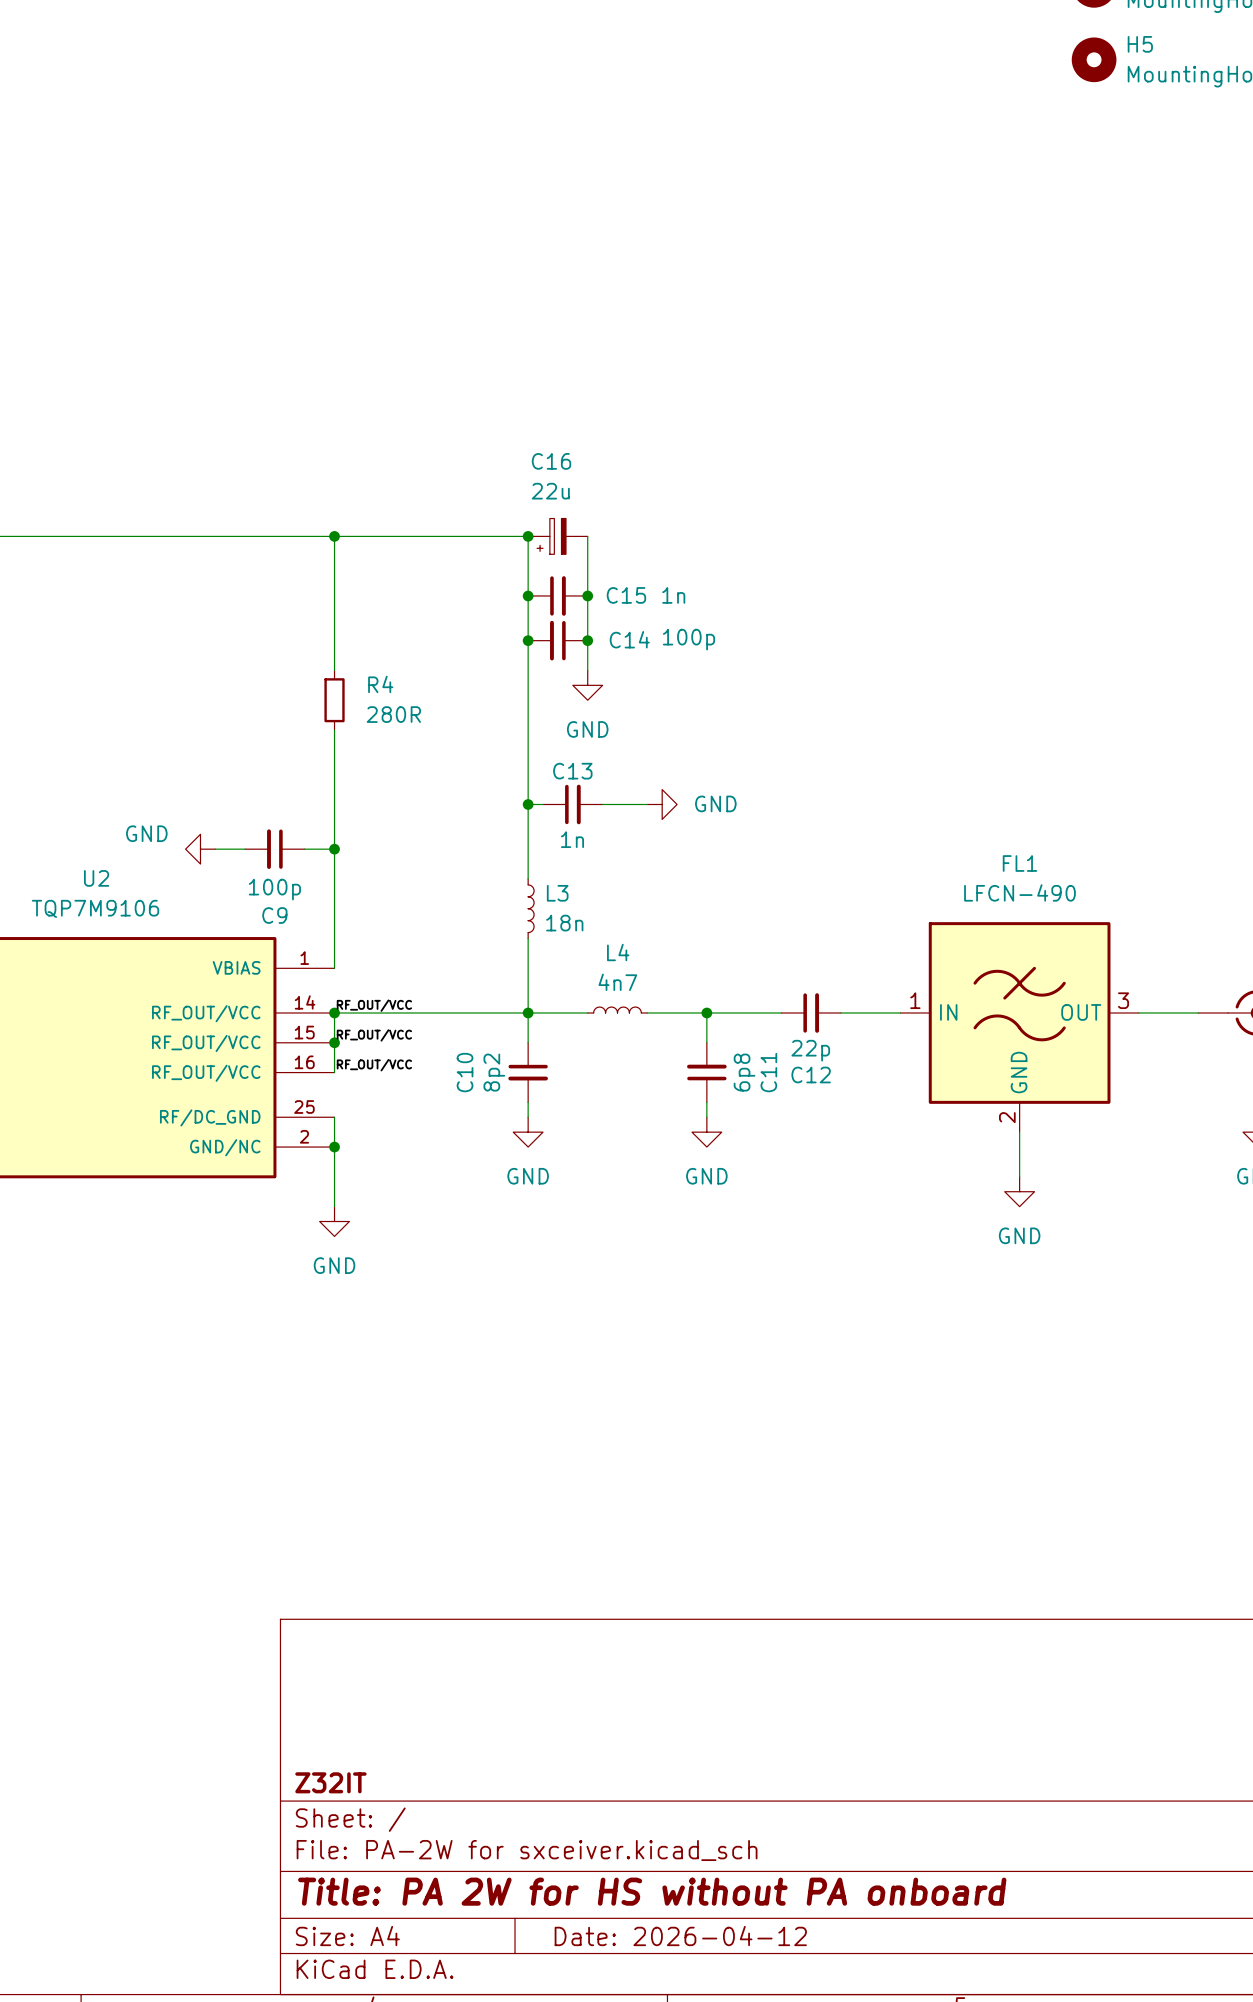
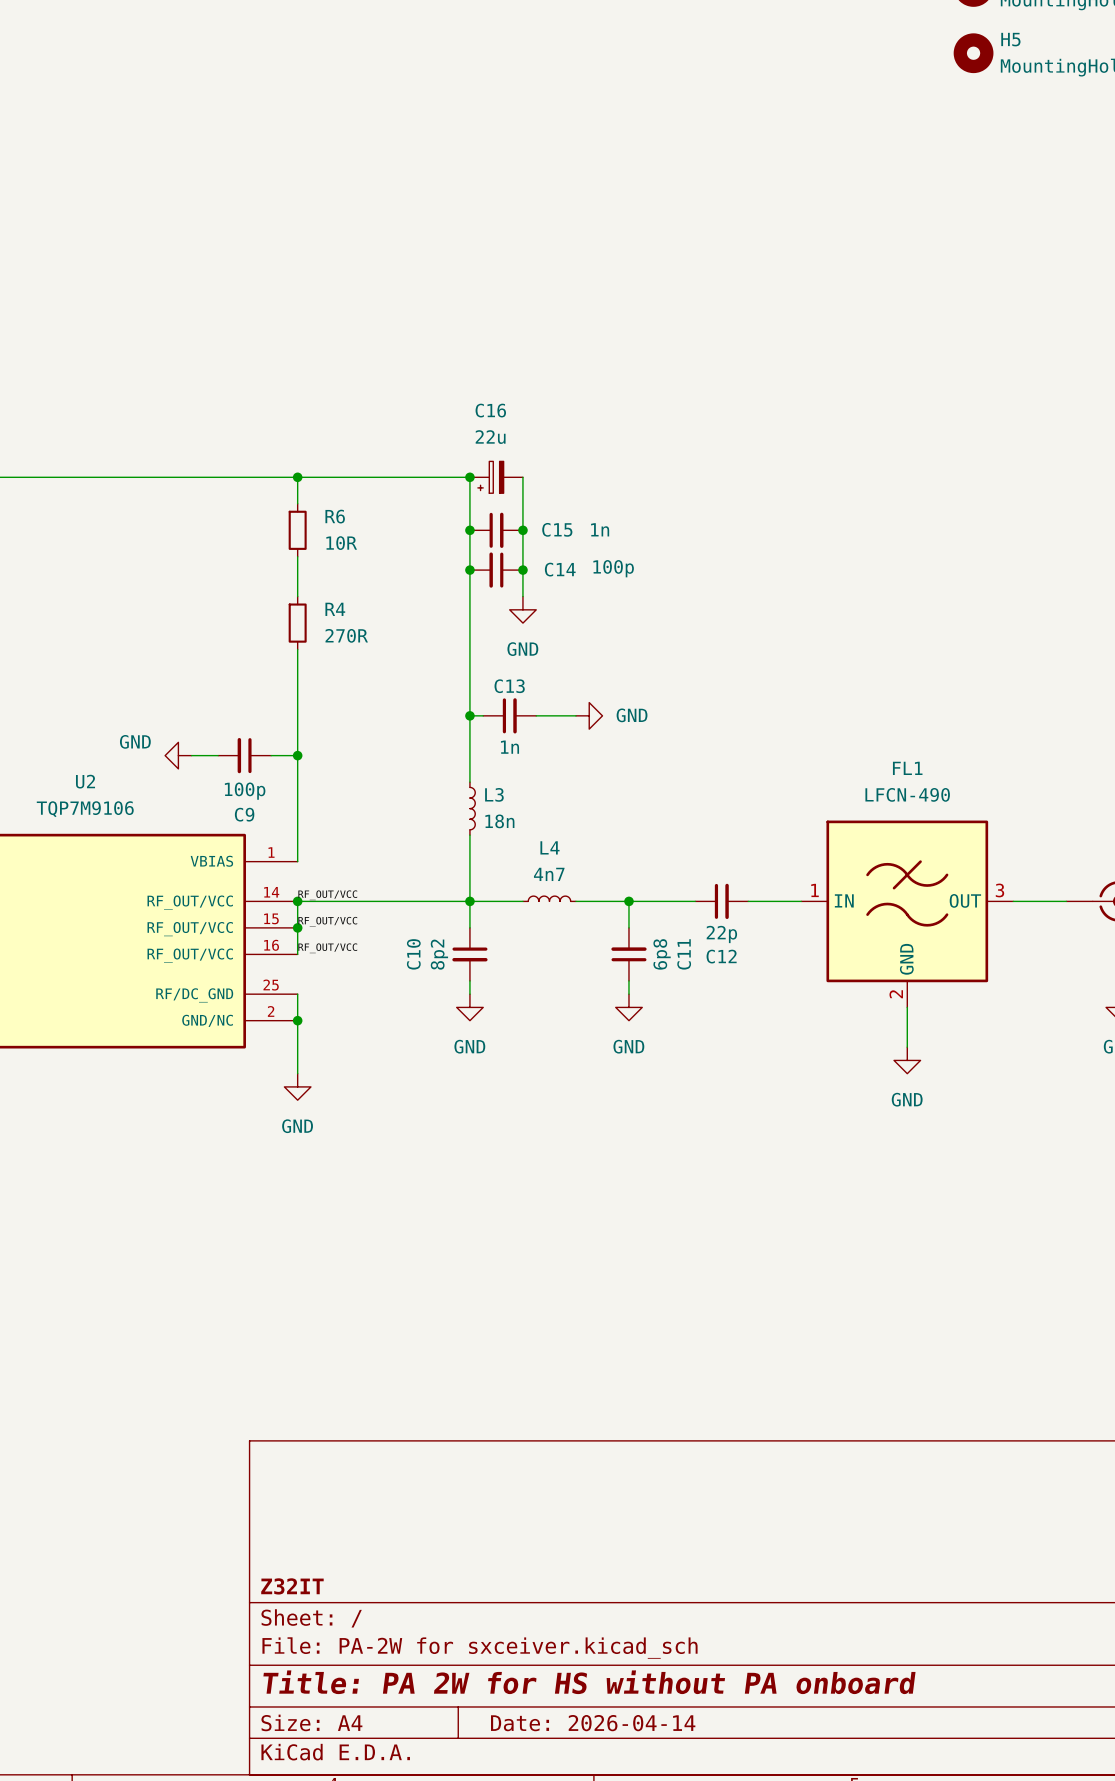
wire: (334, 566) (334, 625) -> none
R6: none -> 10R (297, 530)
R4 value: 280R (393, 714) -> 270R (346, 635)
title block: Date: 2026-04-12 (680, 1936) -> Date: 2026-04-14 (593, 1723)

